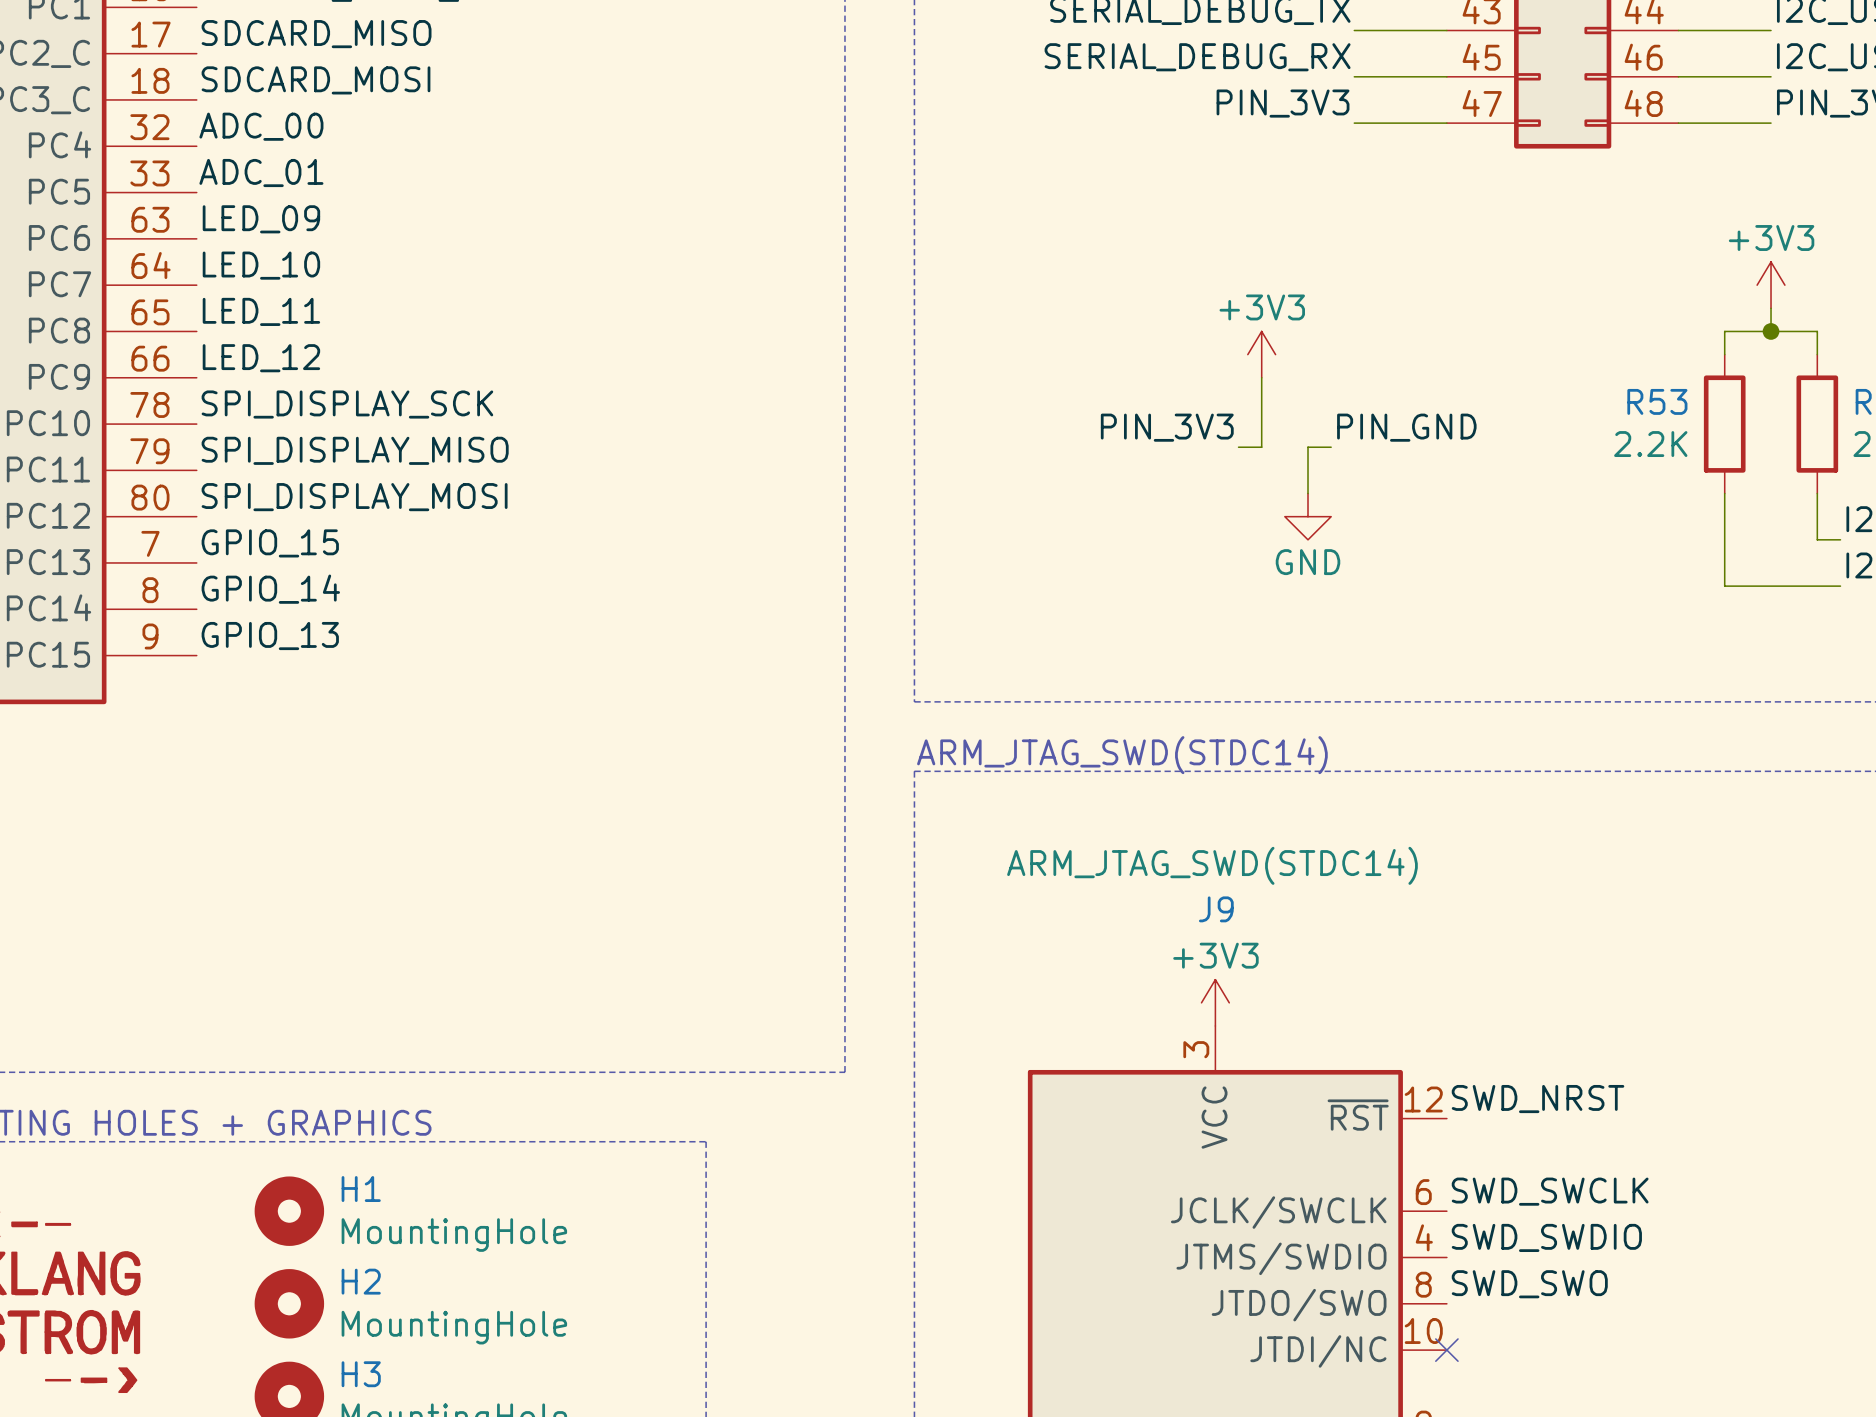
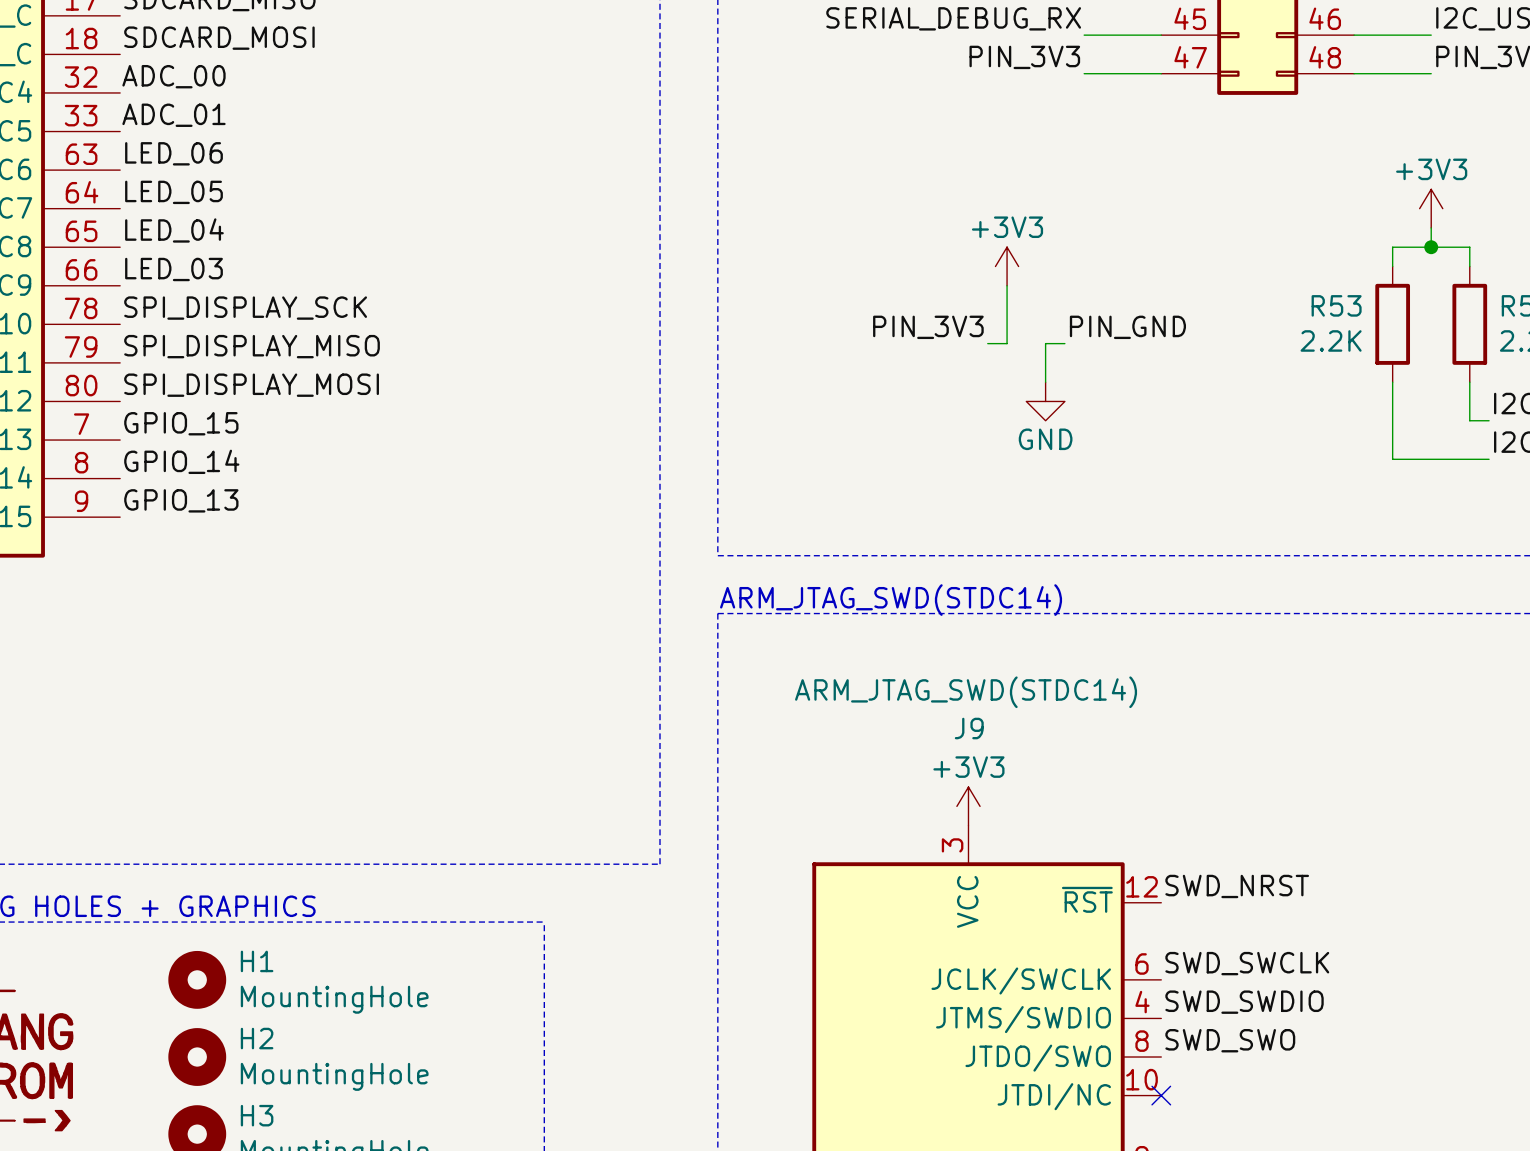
label: LED_09 (261, 219) -> LED_06 (173, 153)
label: LED_10 (261, 265) -> LED_05 (173, 192)
label: LED_11 (261, 311) -> LED_04 (174, 230)
label: LED_12 (261, 358) -> LED_03 (173, 269)

